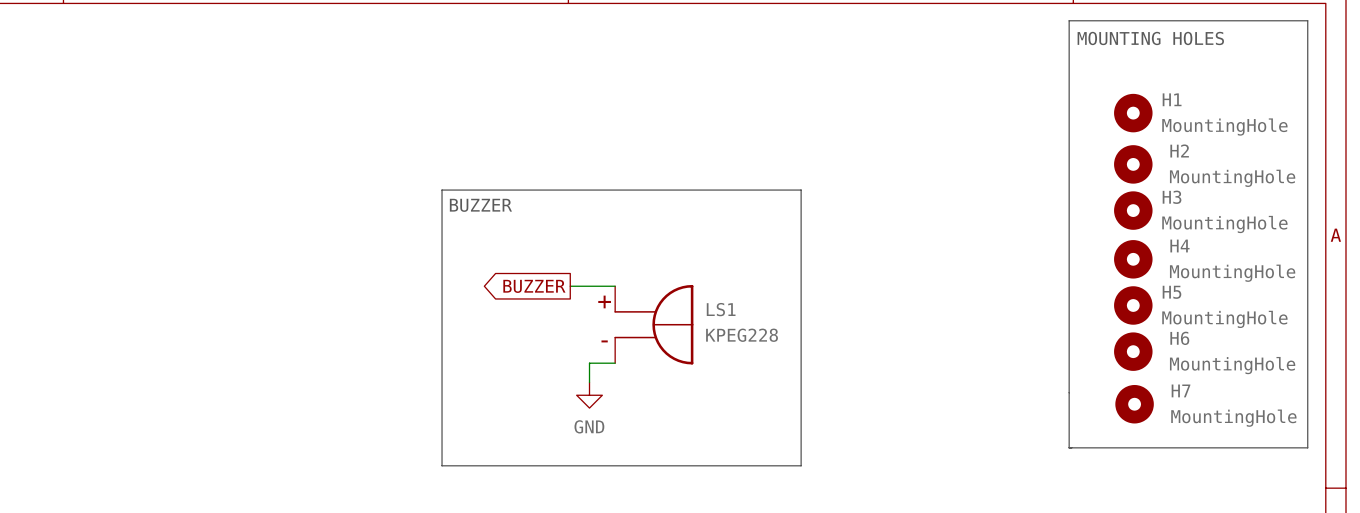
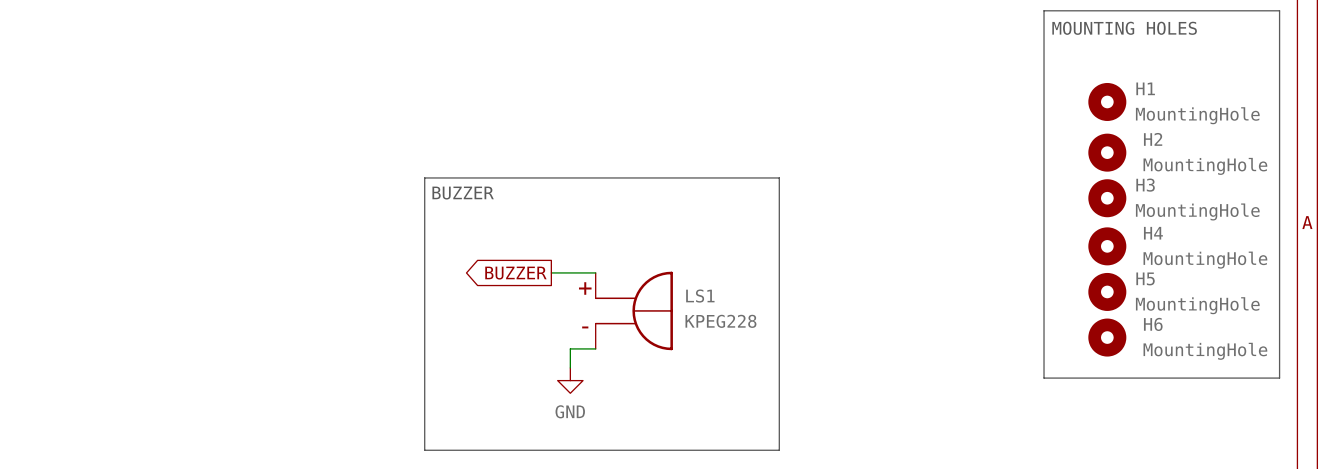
line: (1069, 392) (1069, 447) (1307, 447) (1307, 392) -> (1044, 378) (1279, 378)
H7: MountingHole (1134, 404) -> none

